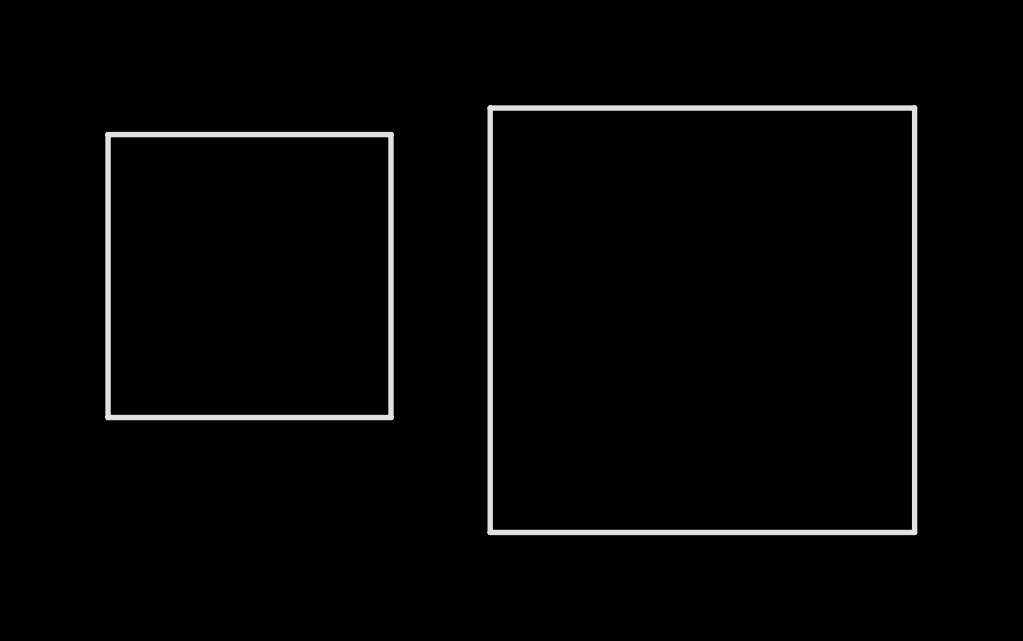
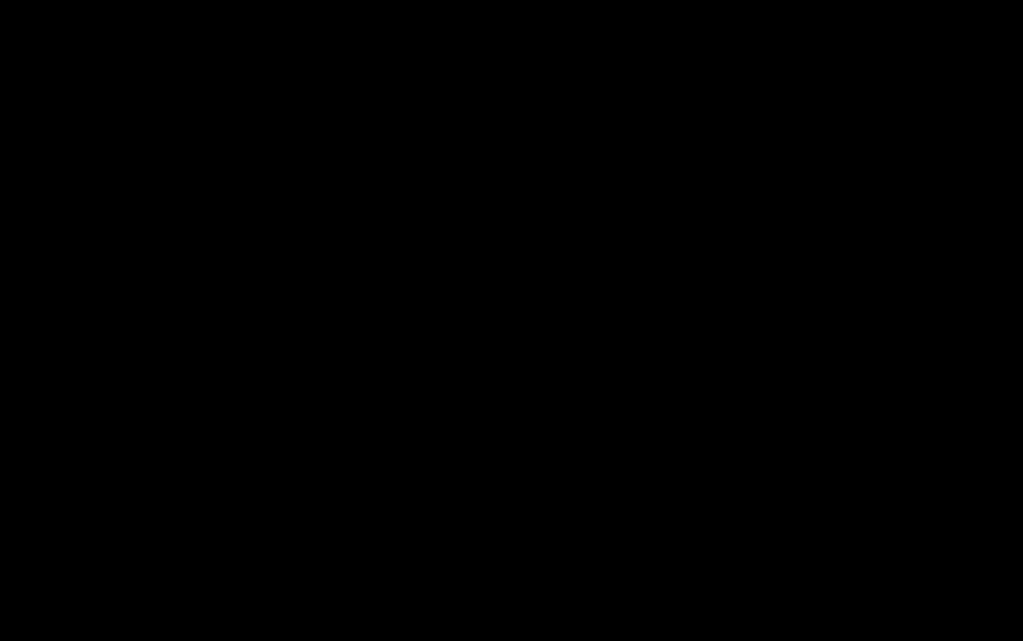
line: (490, 108) (914, 108) (914, 532) (490, 532) (490, 108) -> none
line: (108, 134) (390, 134) (390, 417) (108, 417) (108, 134) -> none

